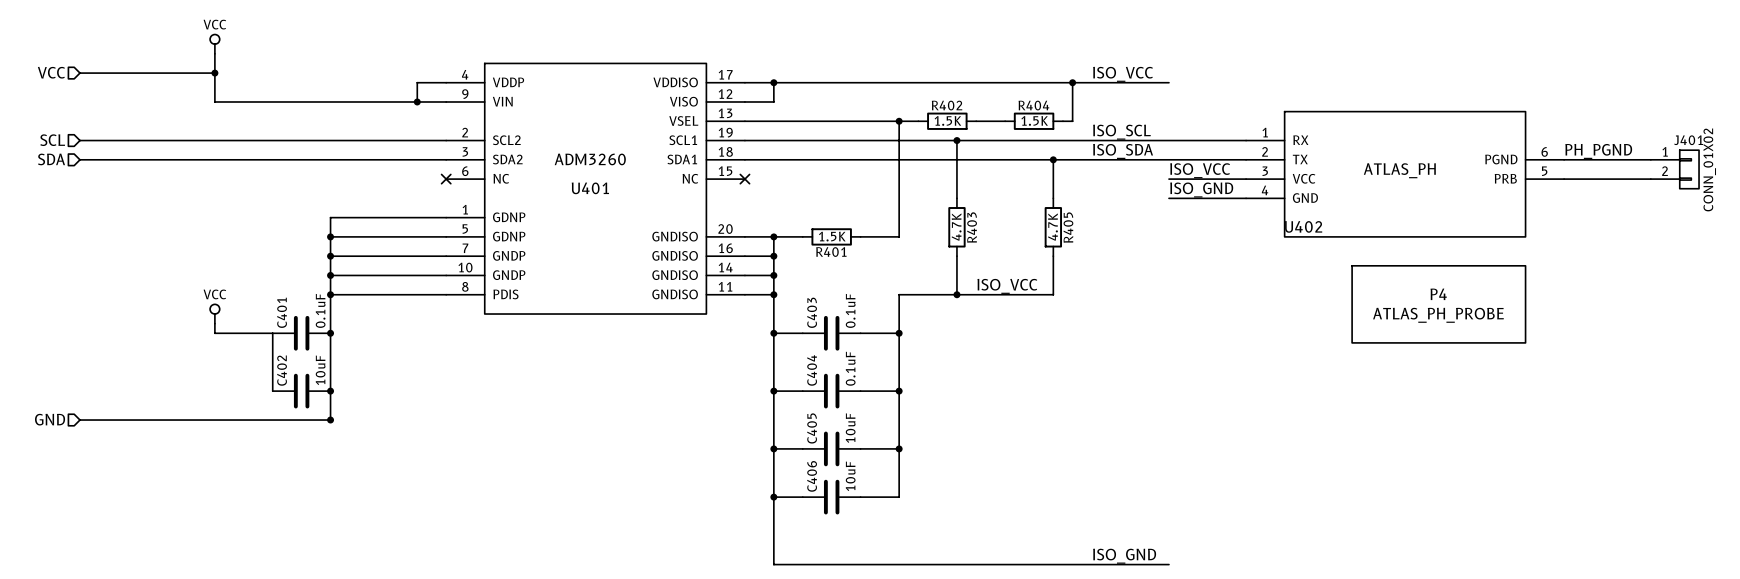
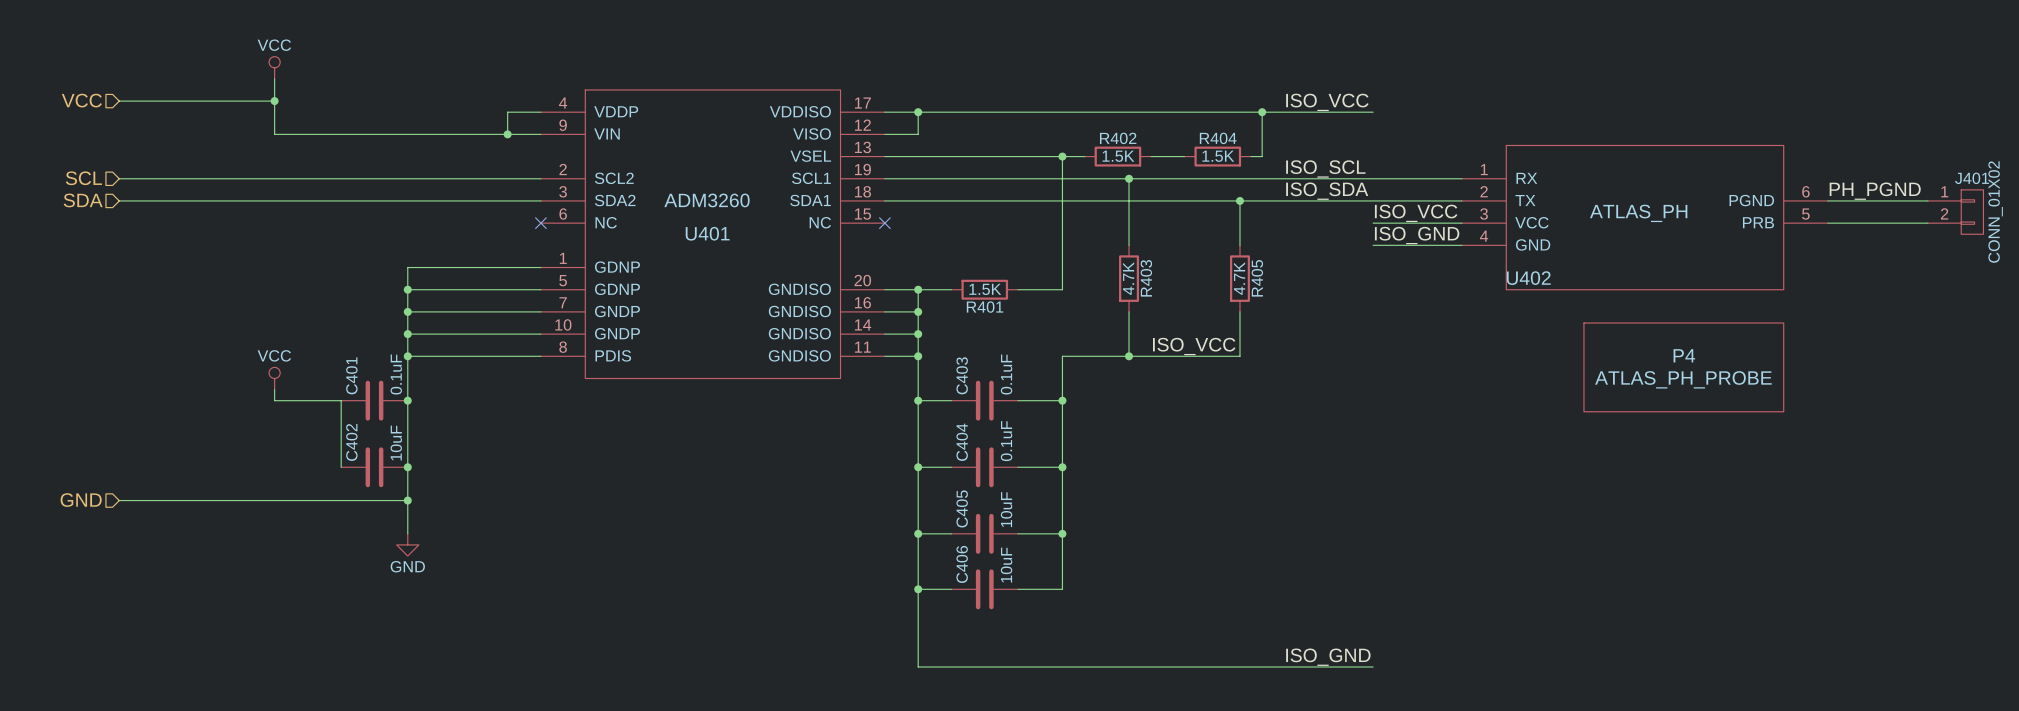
wire: none -> (407, 500) (407, 533)
power symbol: none -> GND (407, 544)

